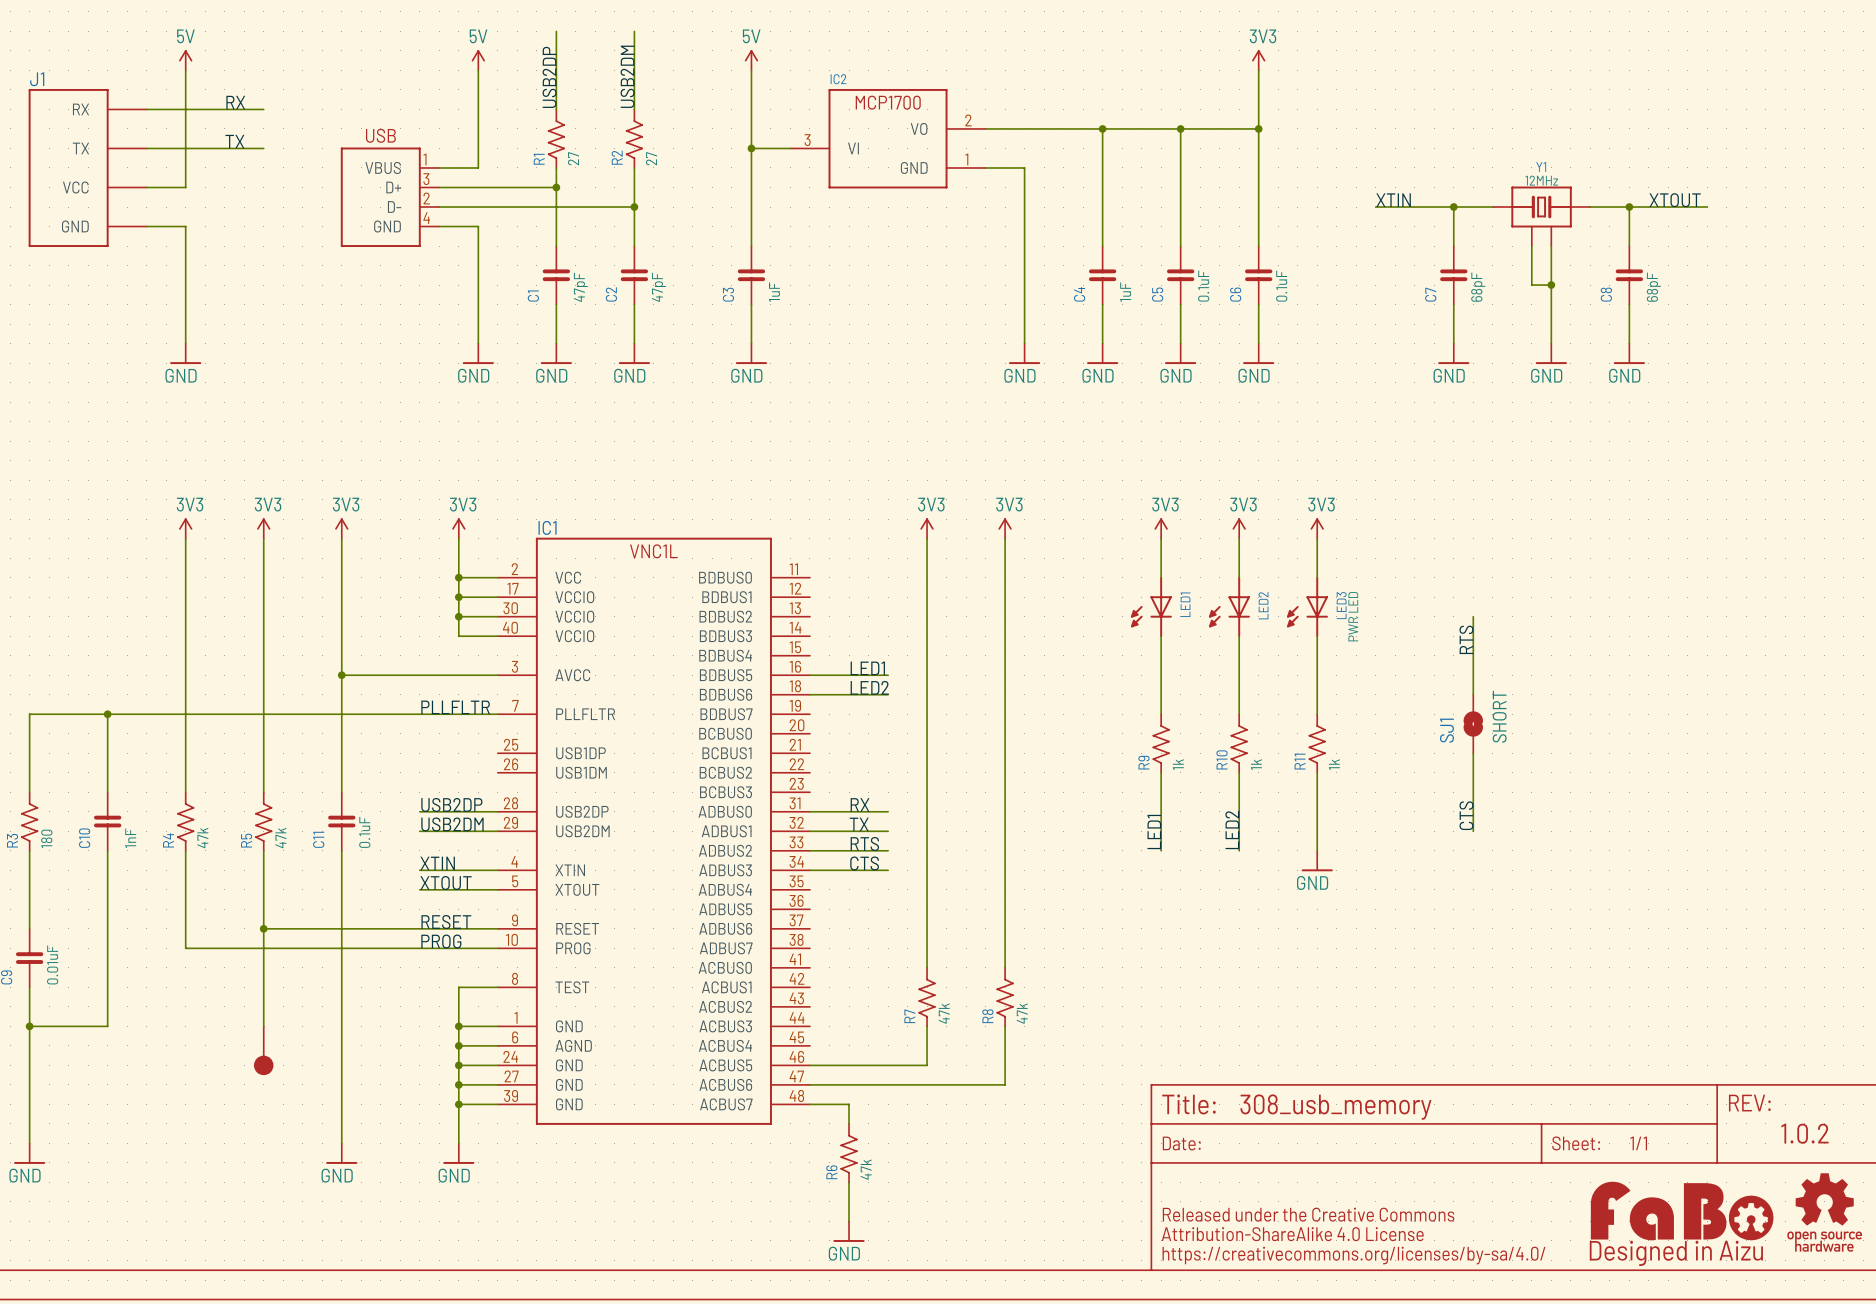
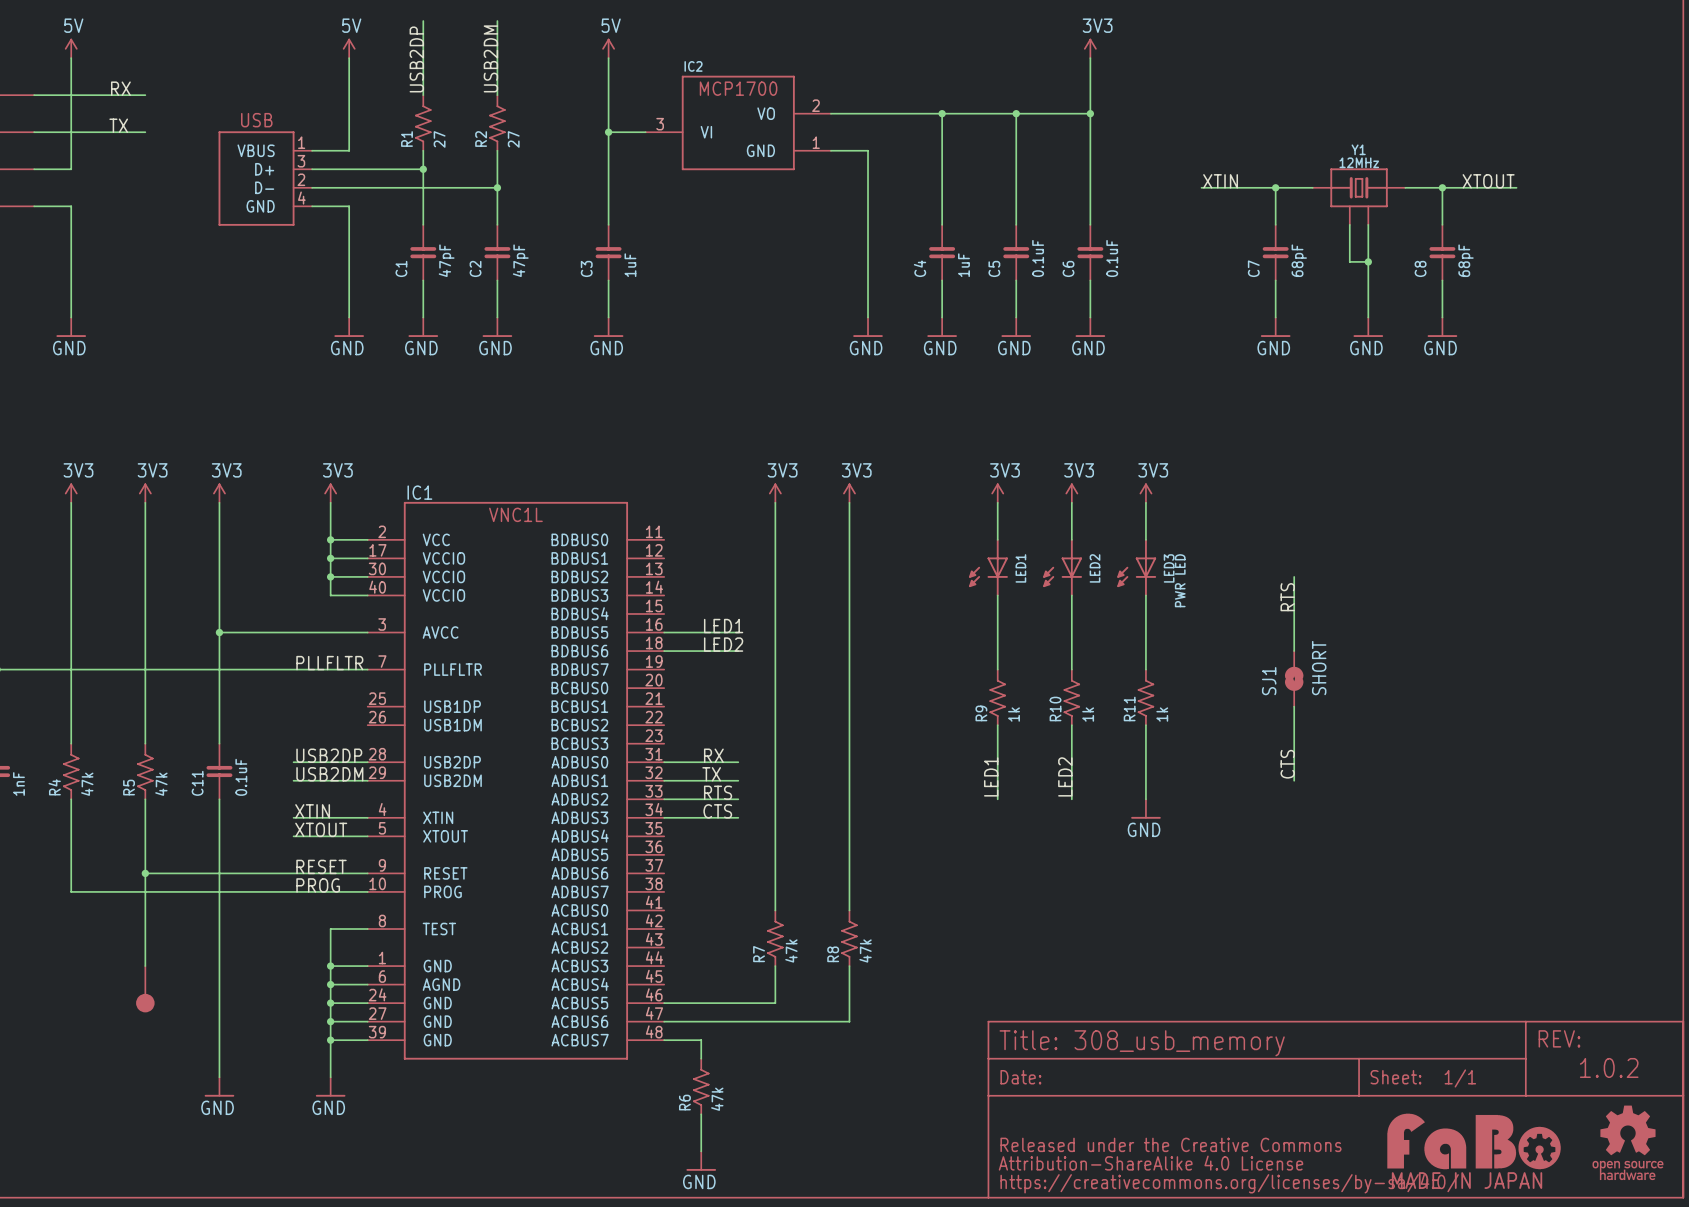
part: none -> (1474, 1141)
part: (1682, 1211) -> none

